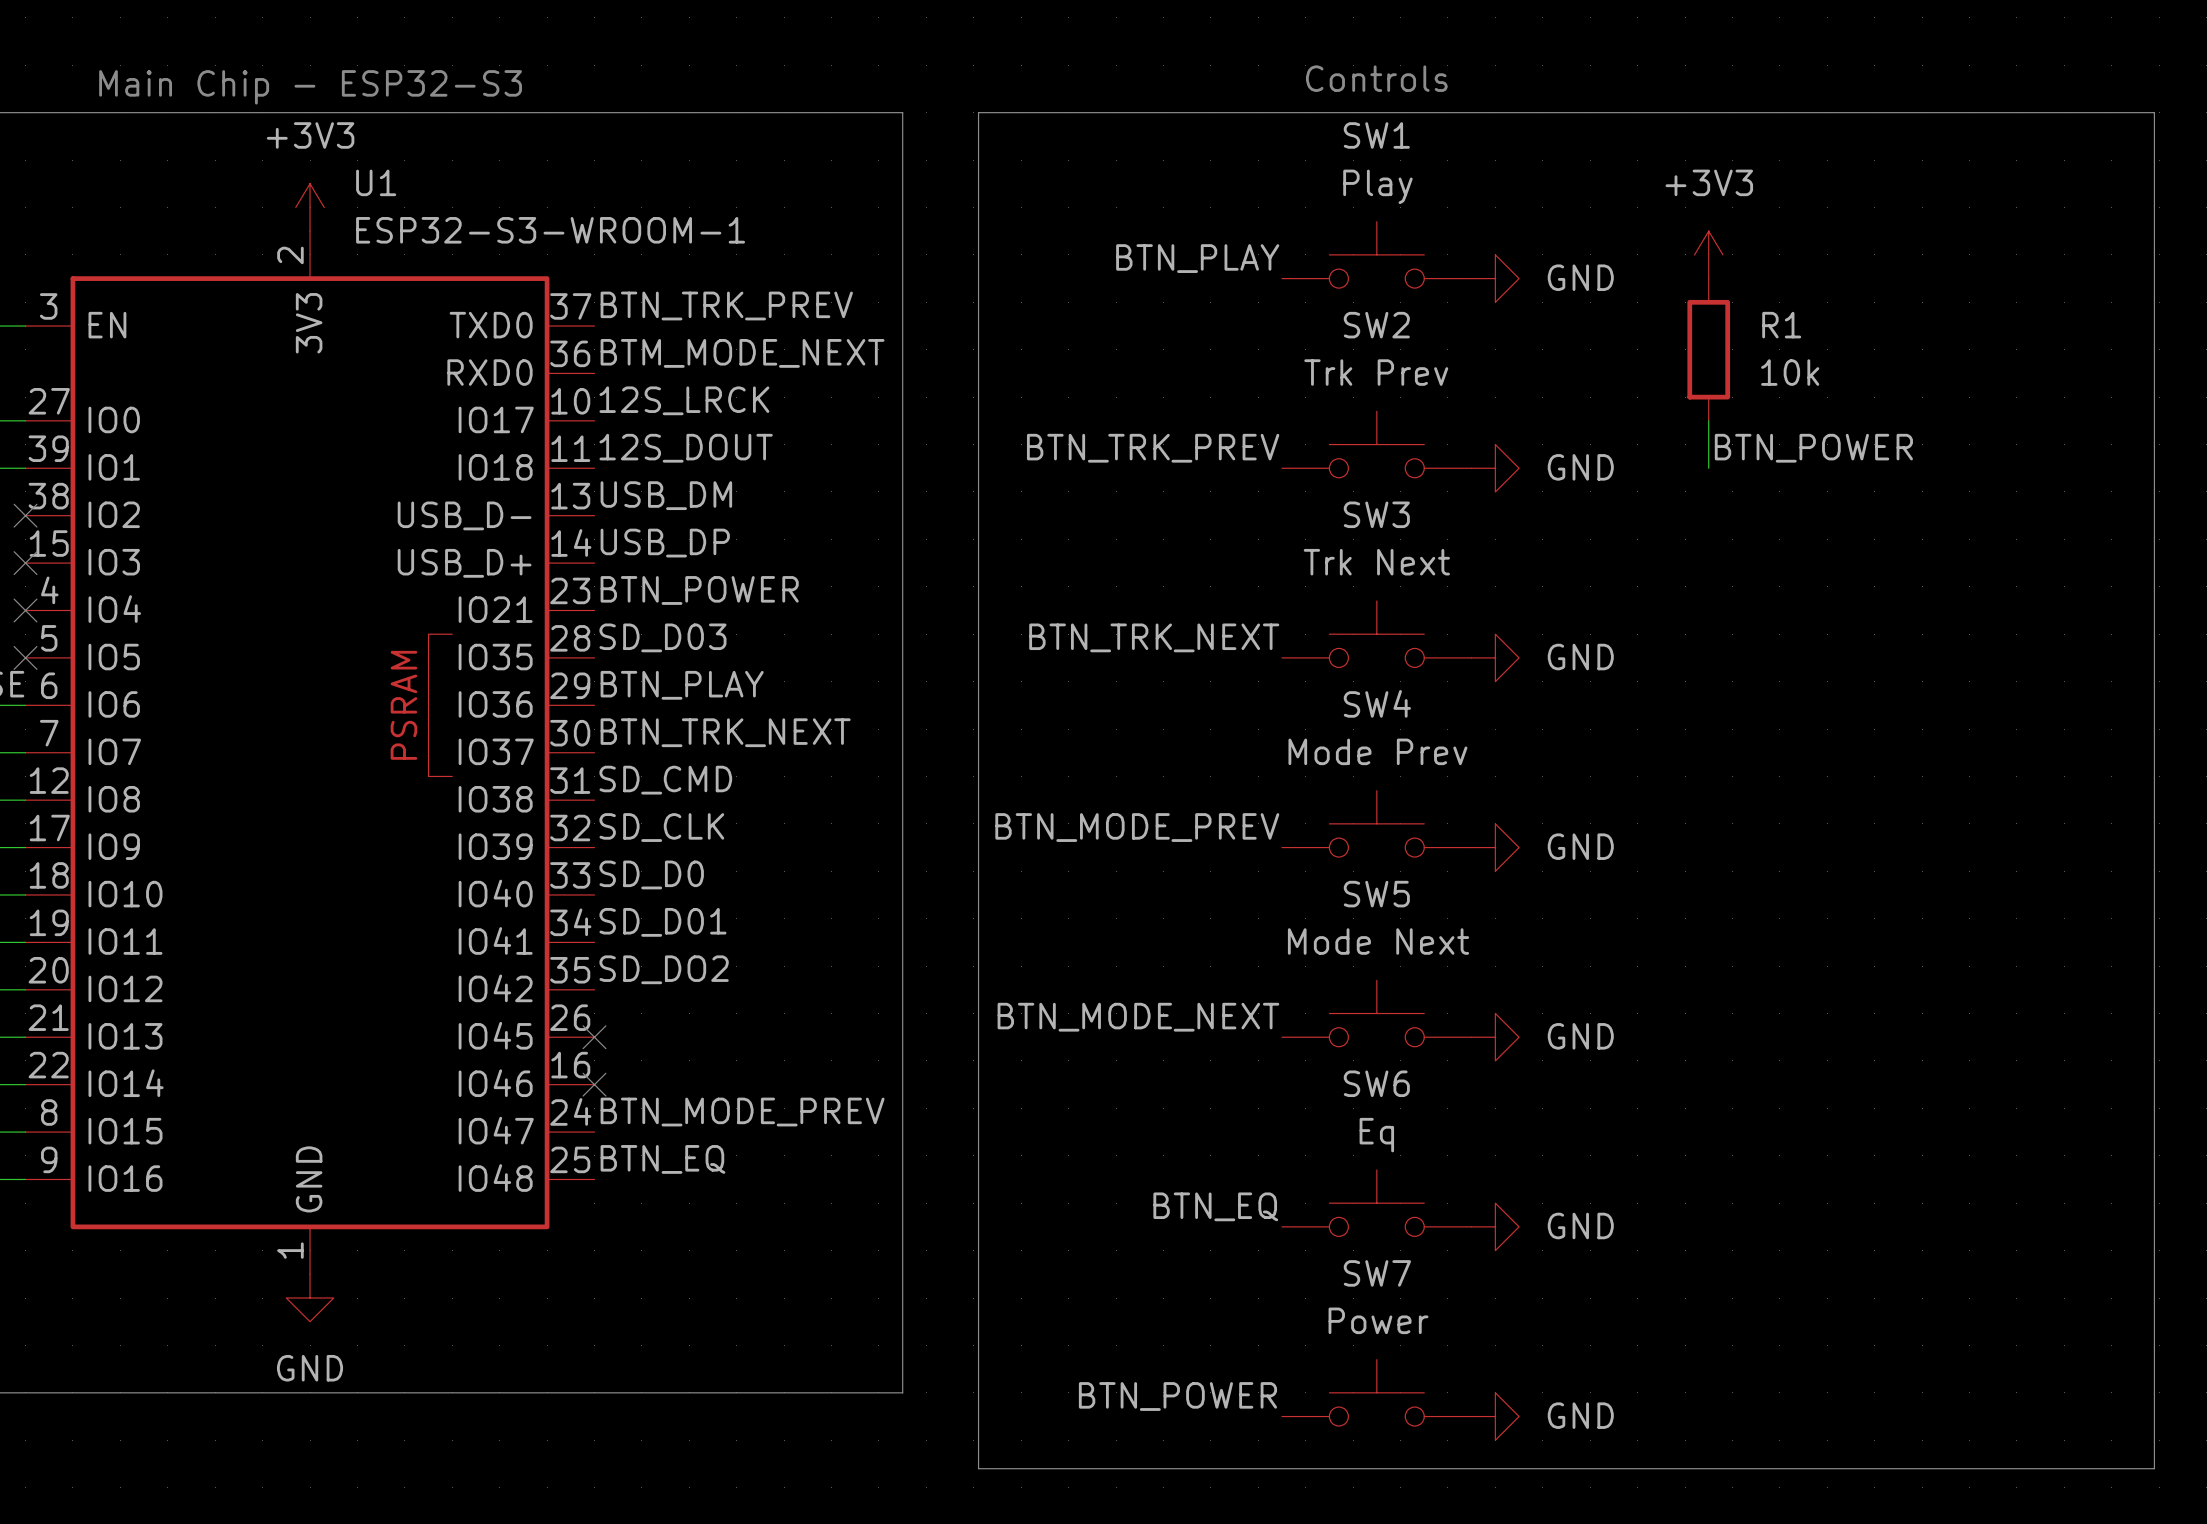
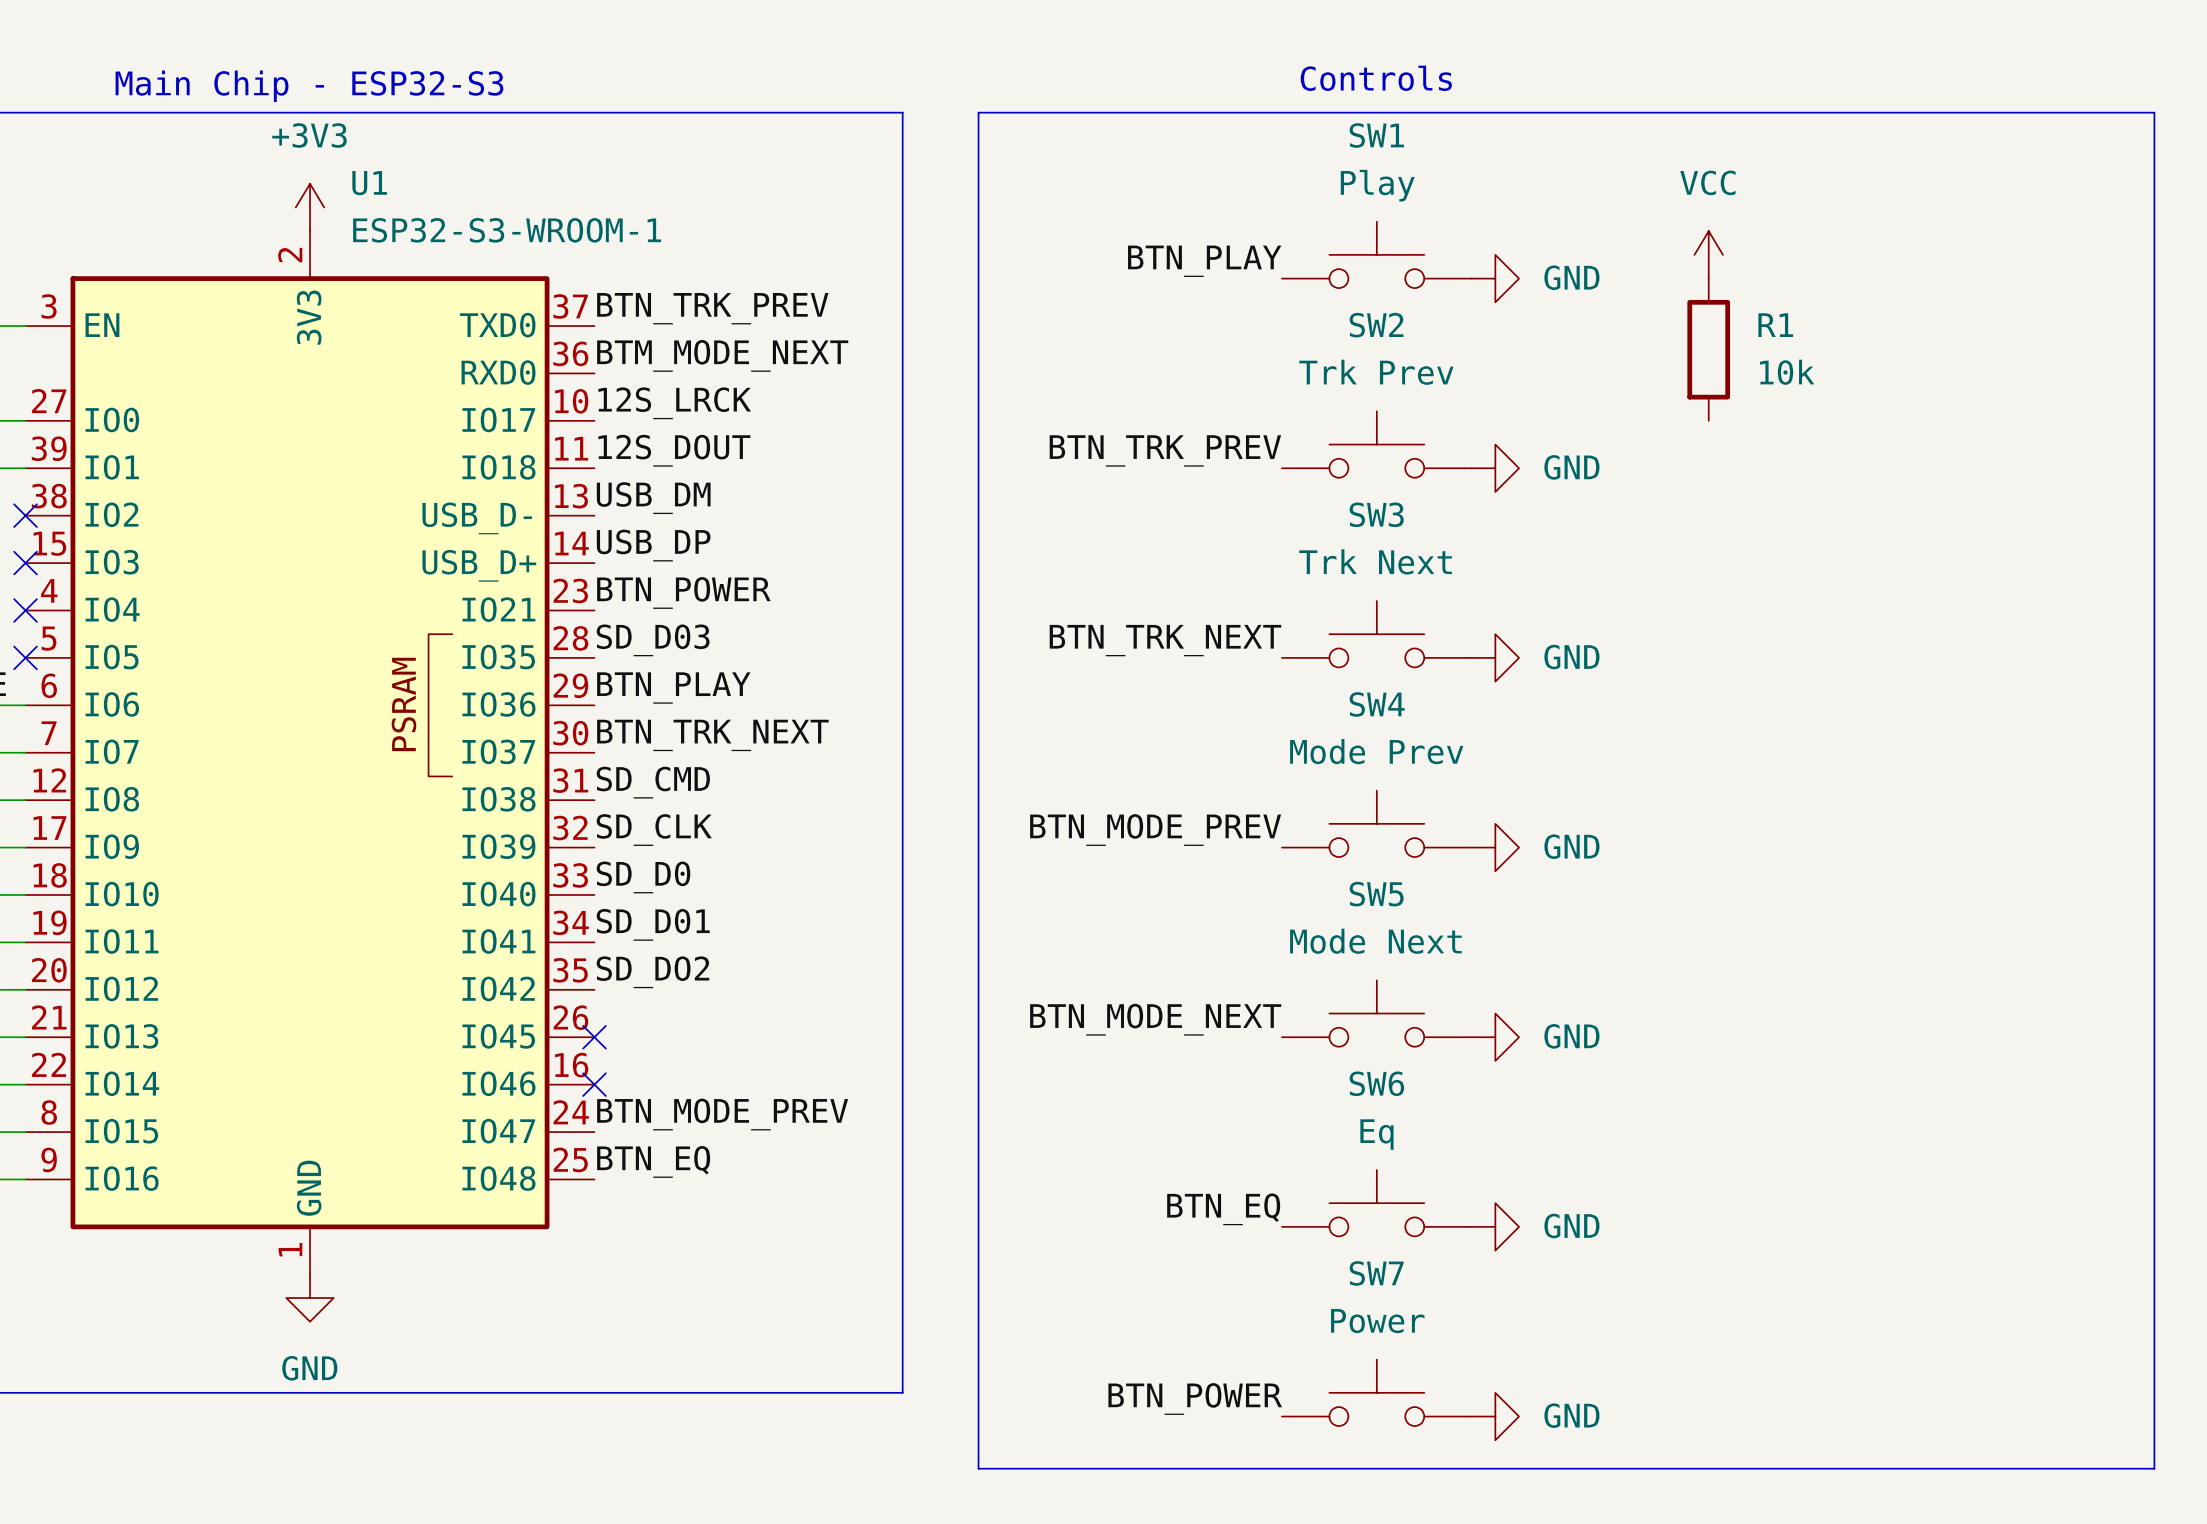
power symbol: +3V3 (1708, 254) -> VCC (1708, 254)
wire: (1708, 420) (1708, 468) -> none
label: BTN_POWER (1813, 448) -> none

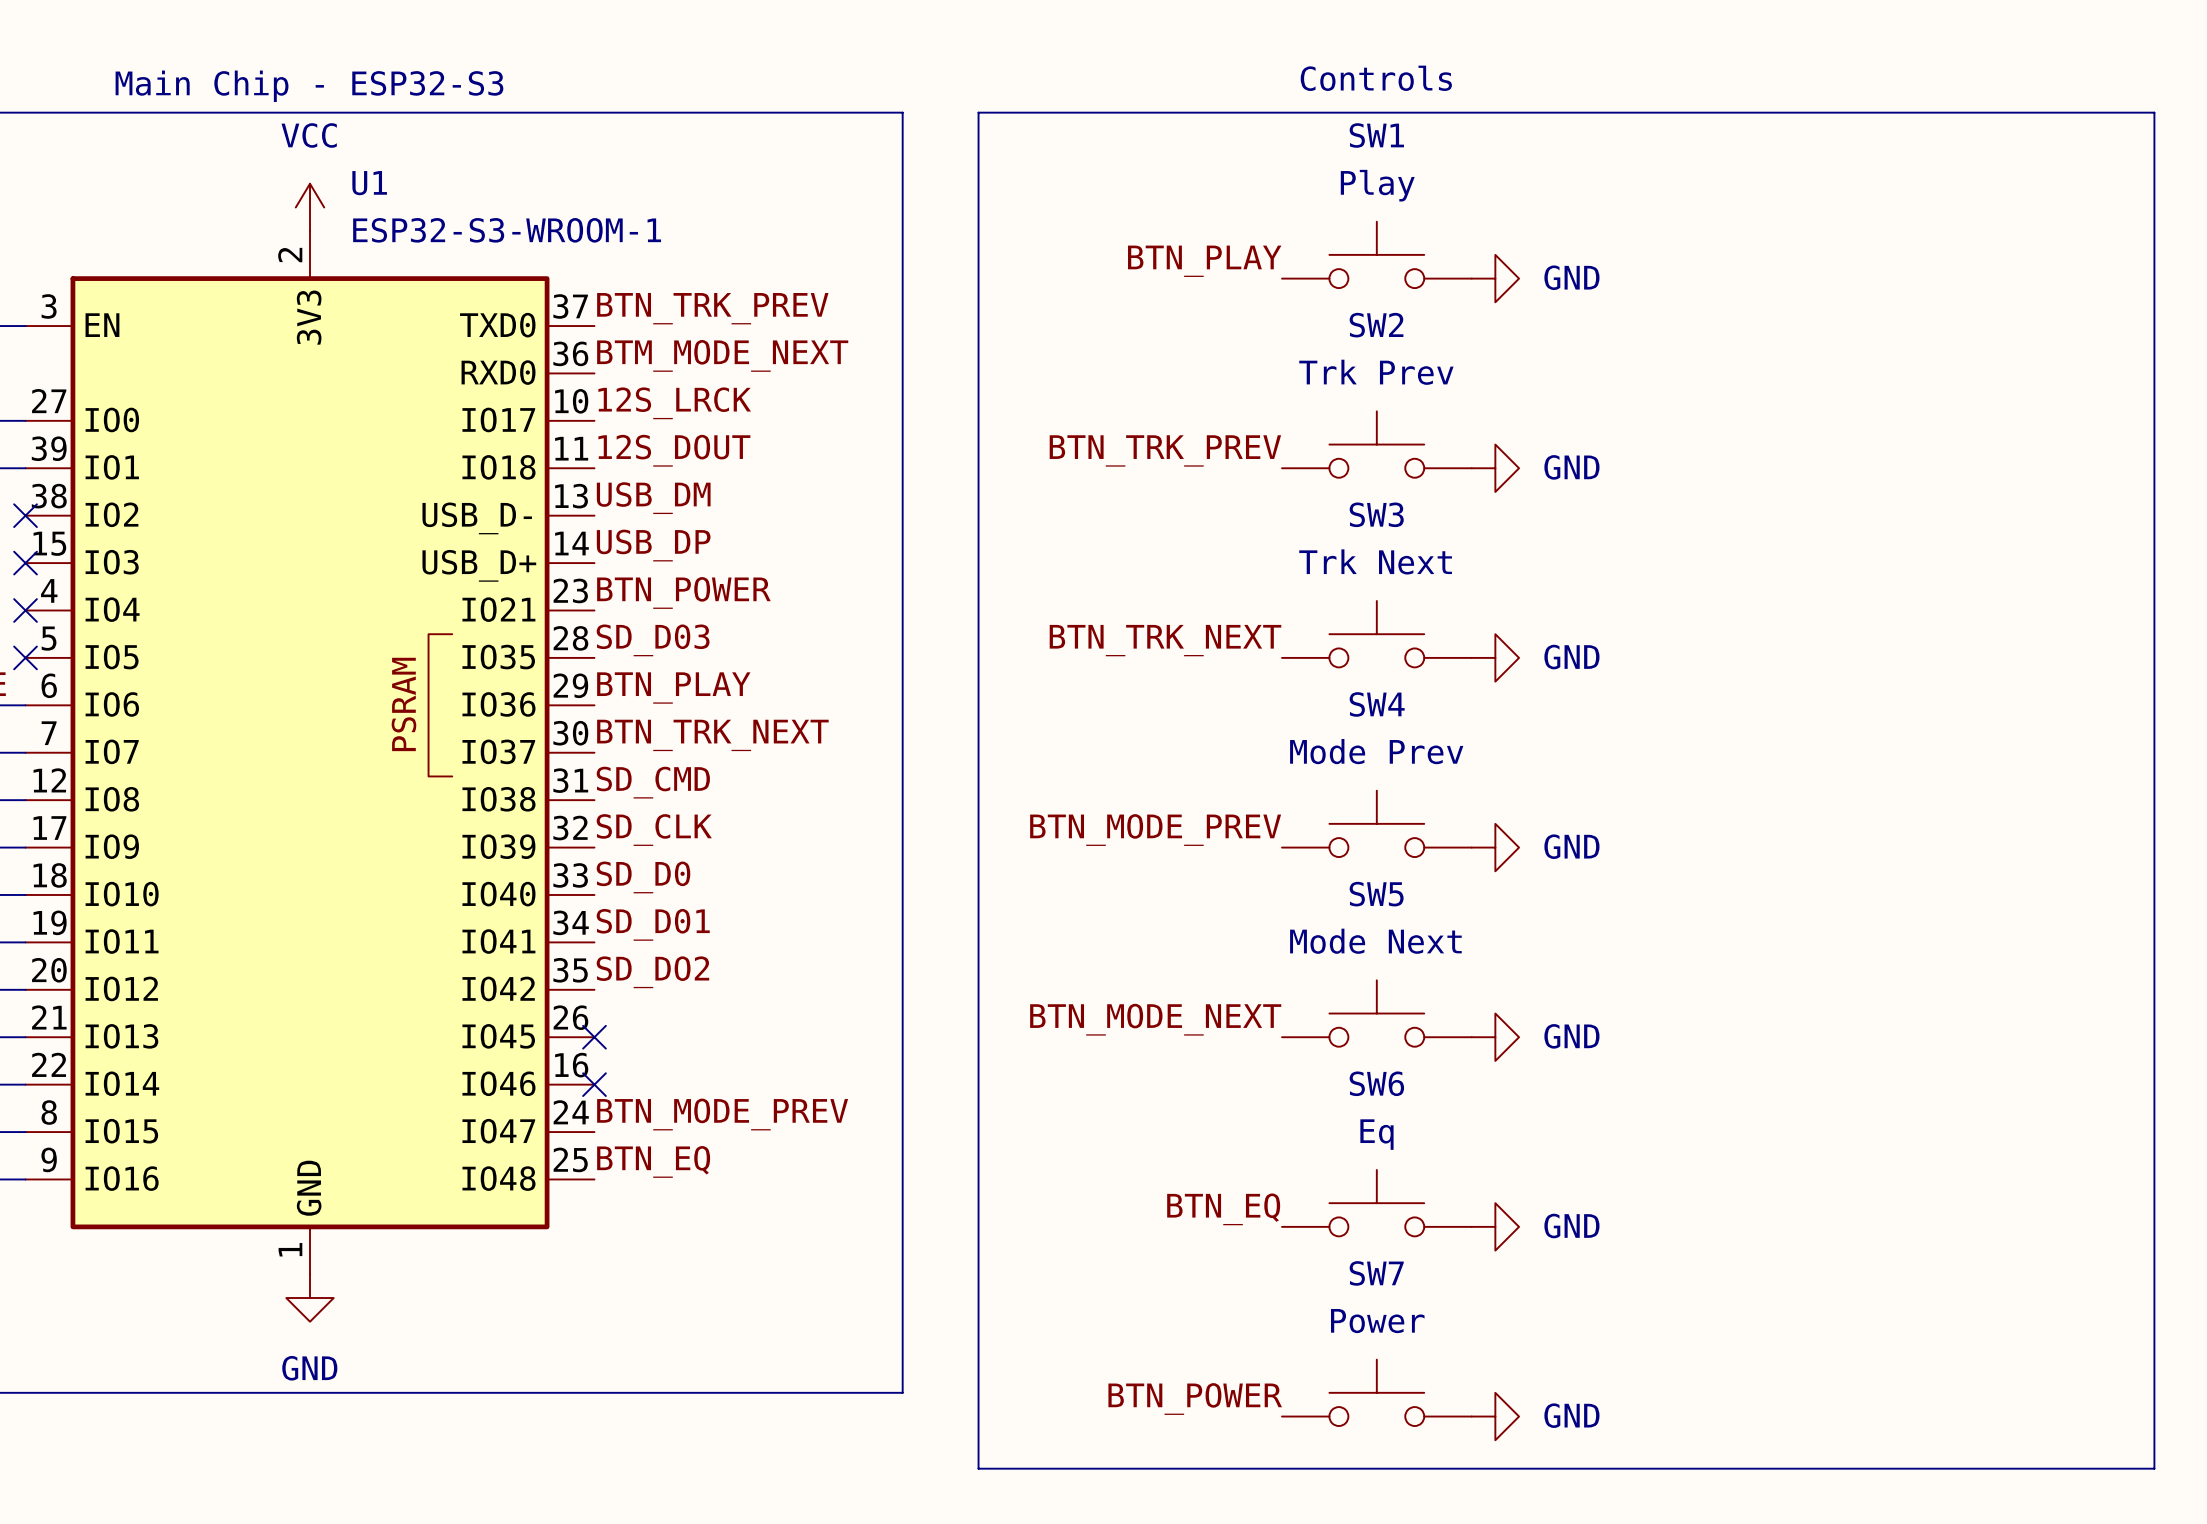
power symbol: +3V3 (310, 207) -> VCC (310, 207)
power symbol: VCC (1708, 254) -> none
R1: 10k (1708, 349) -> none

